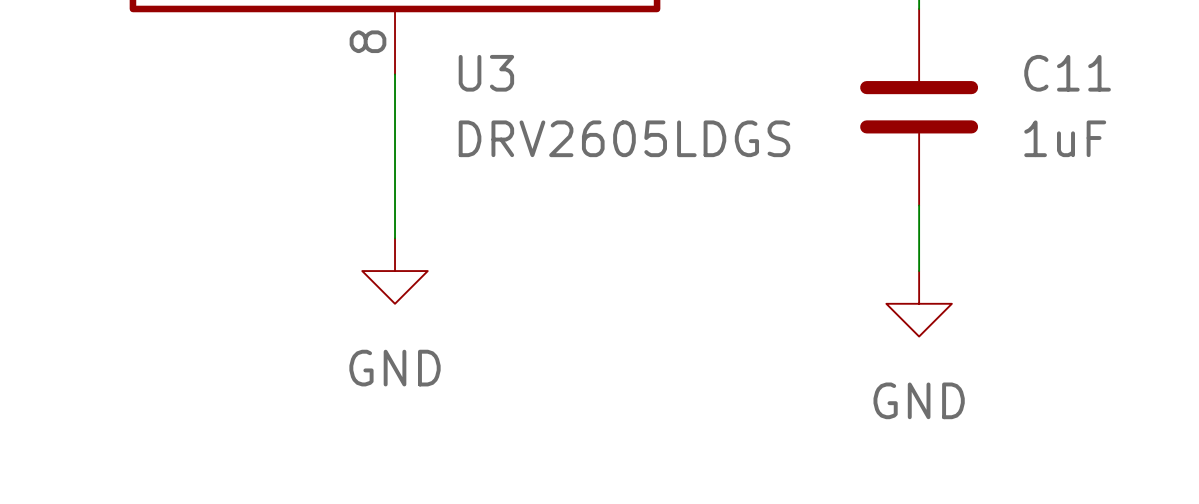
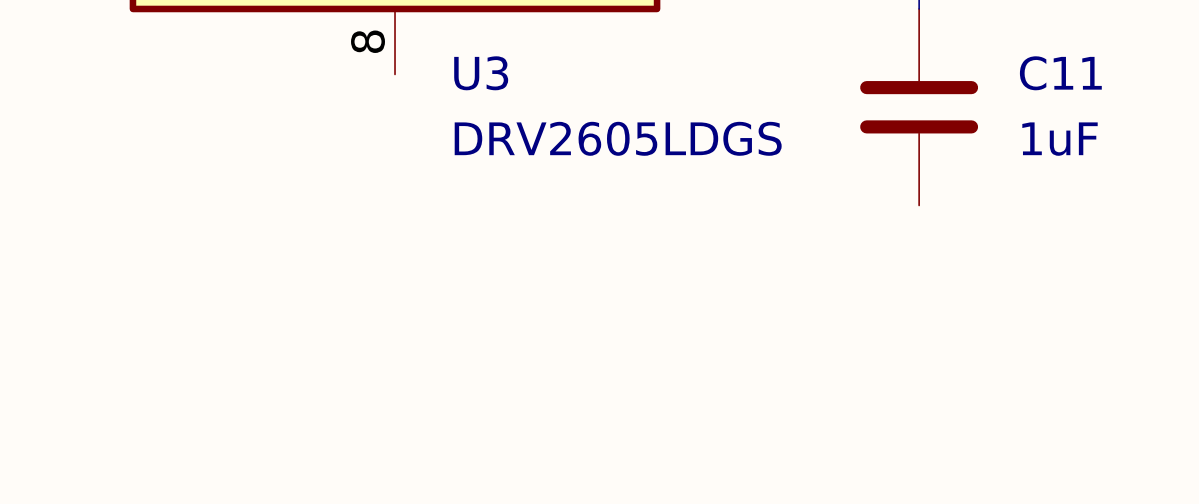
wire: (395, 74) (395, 238) -> none
wire: (919, 205) (919, 271) -> none
power symbol: GND (395, 271) -> none
power symbol: GND (919, 303) -> none

